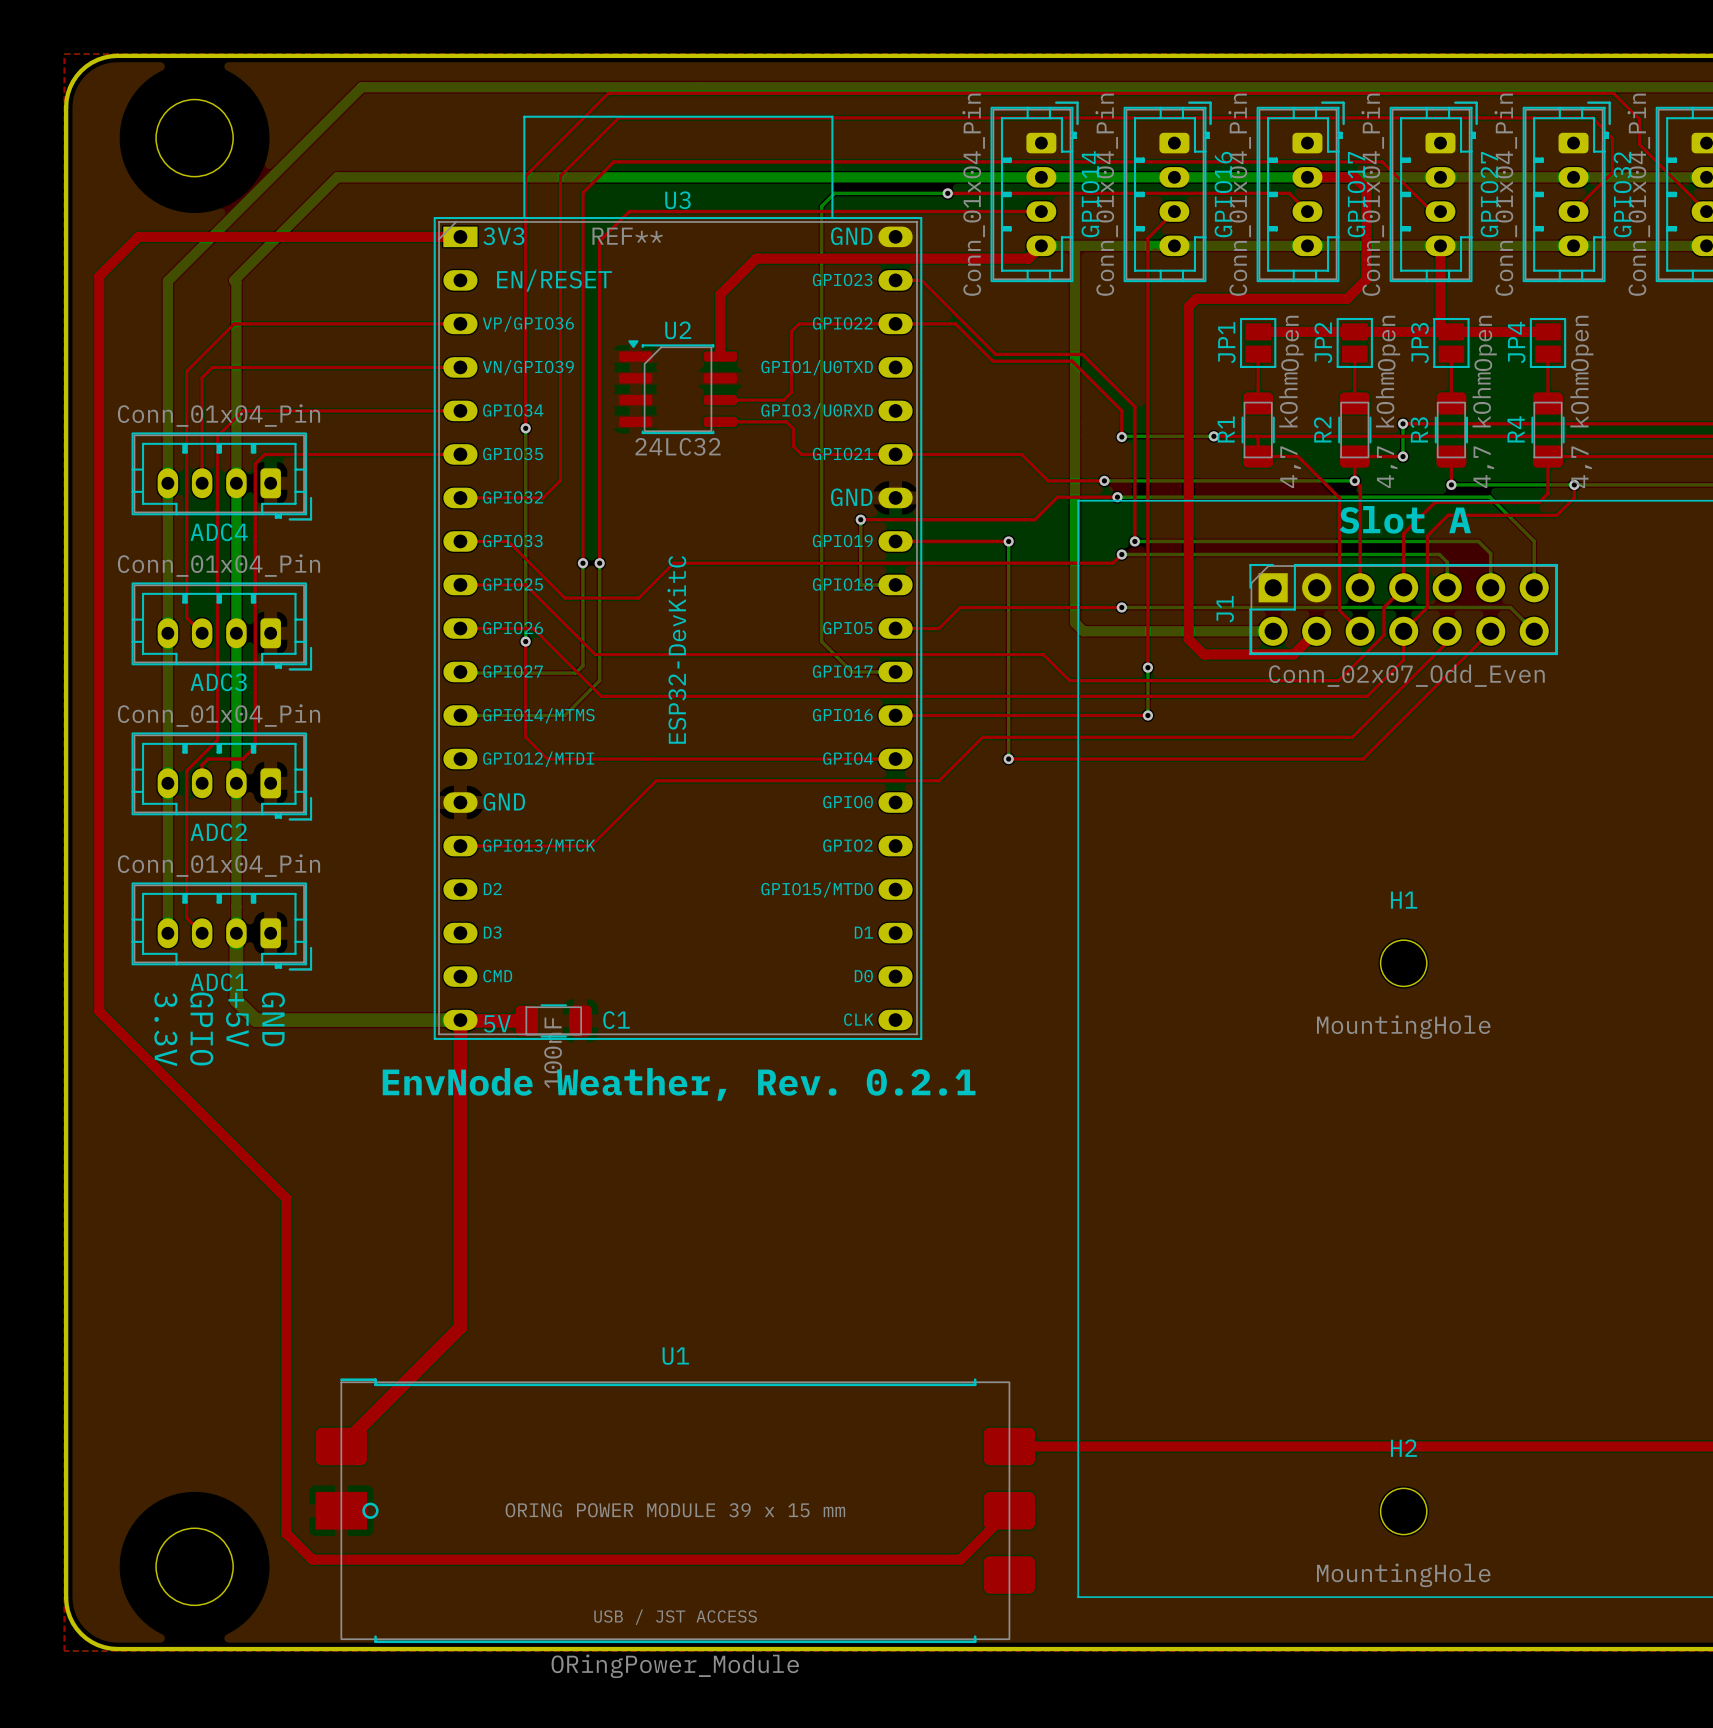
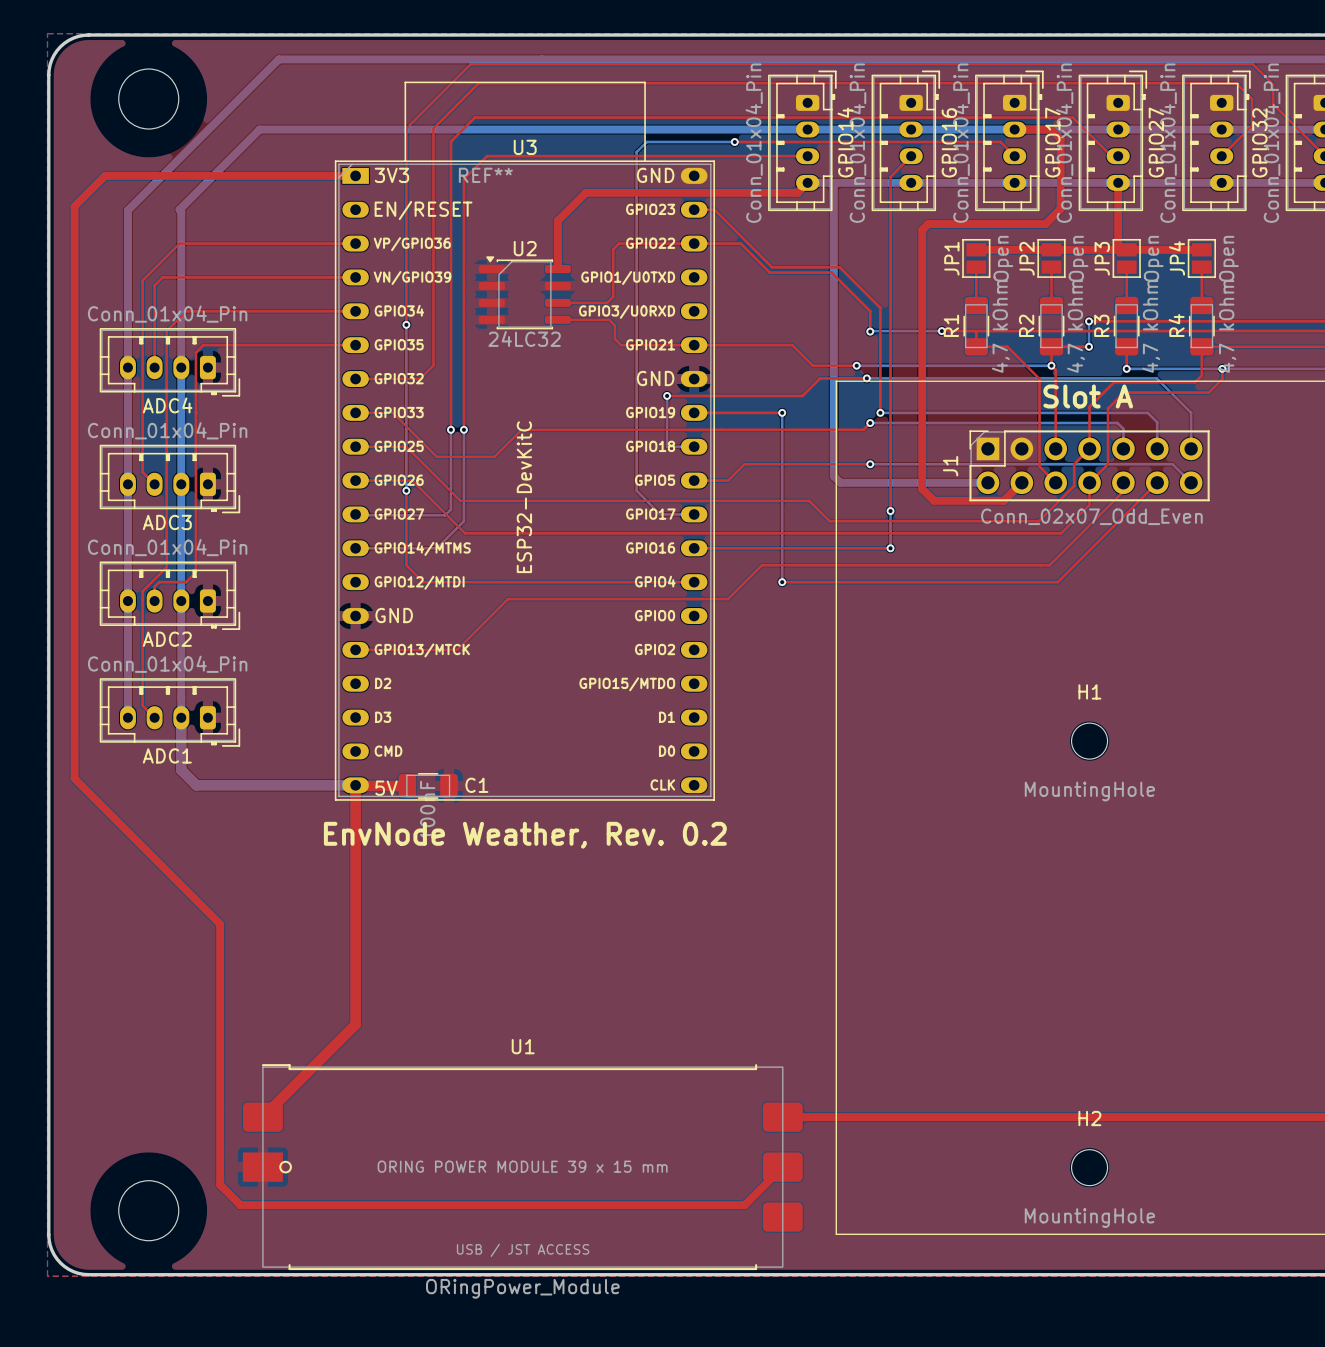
text: +5V (237, 1019) -> none
text: GND (273, 1019) -> none
text: GPIO (201, 1028) -> none
text: 3.3V (165, 1029) -> none
text: EnvNode Weather, Rev. 0.2.1 (679, 1084) -> EnvNode Weather, Rev. 0.2 (525, 835)

